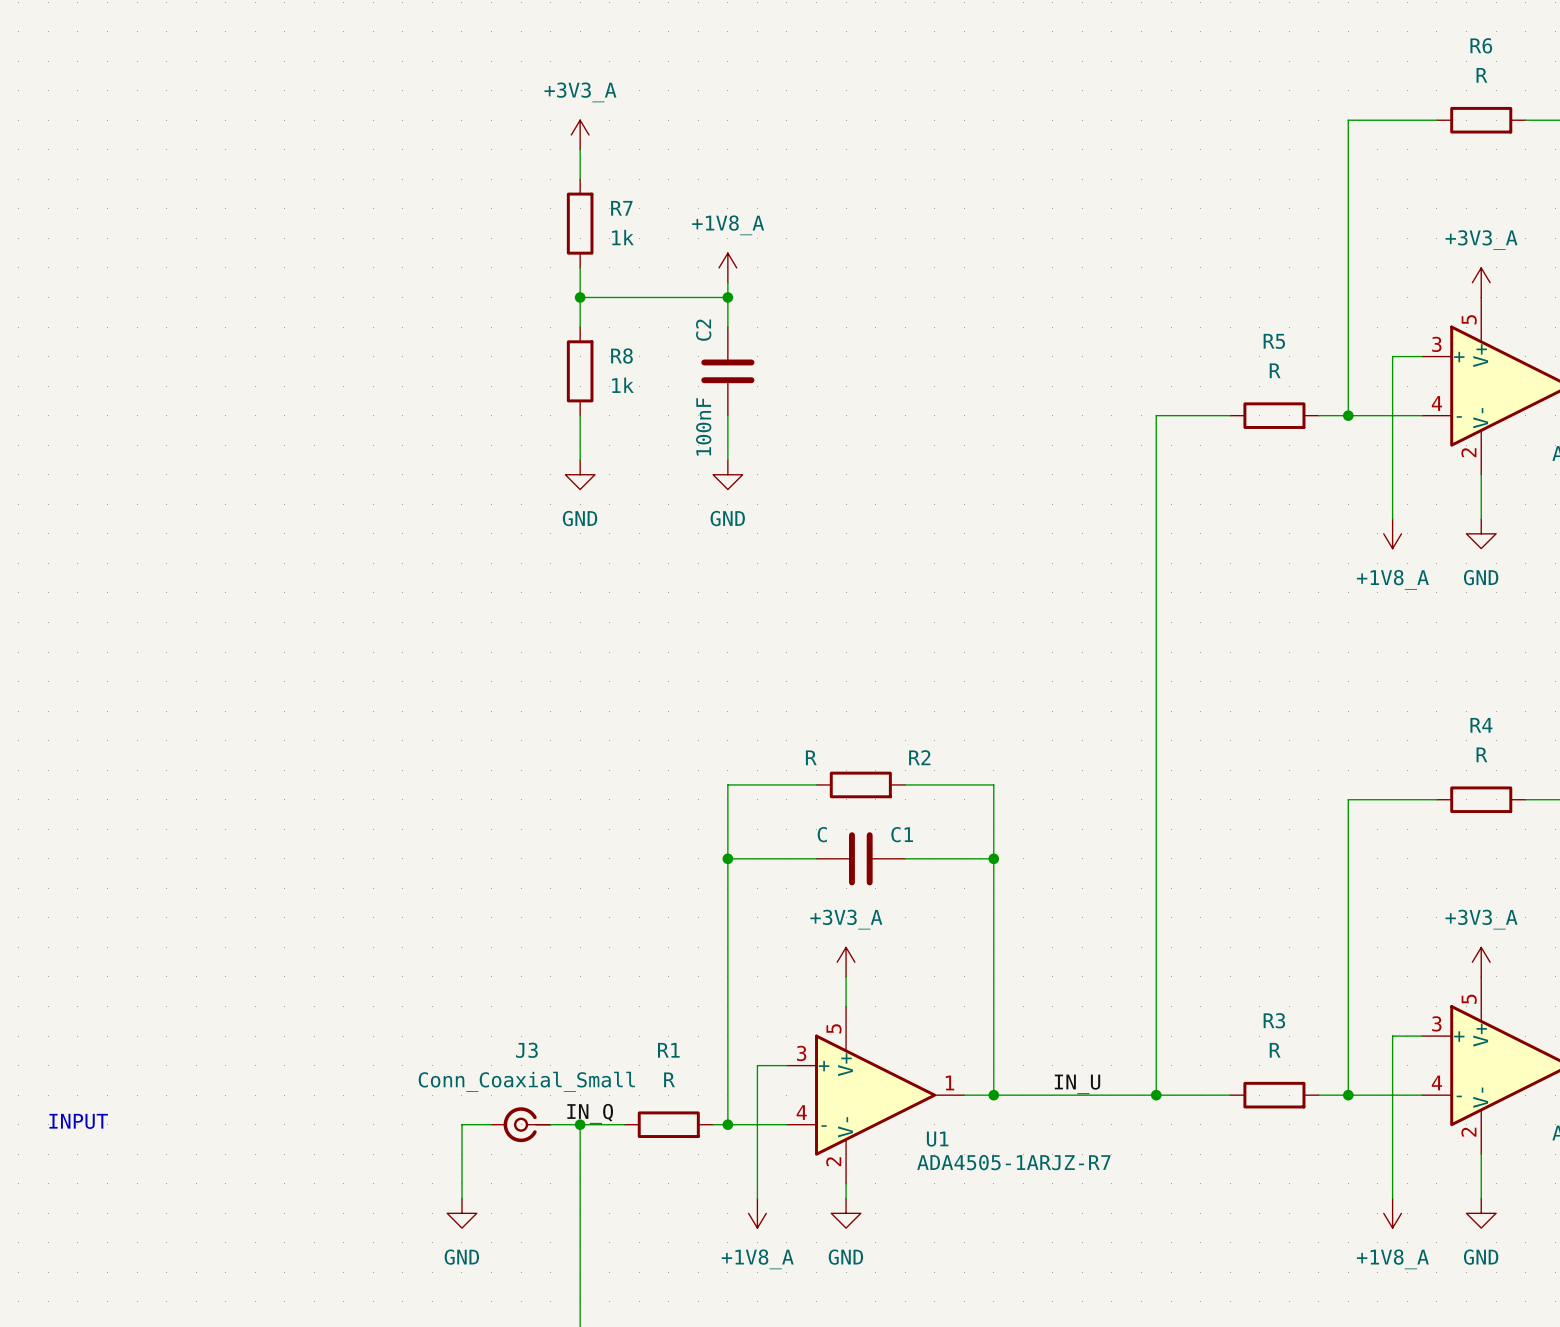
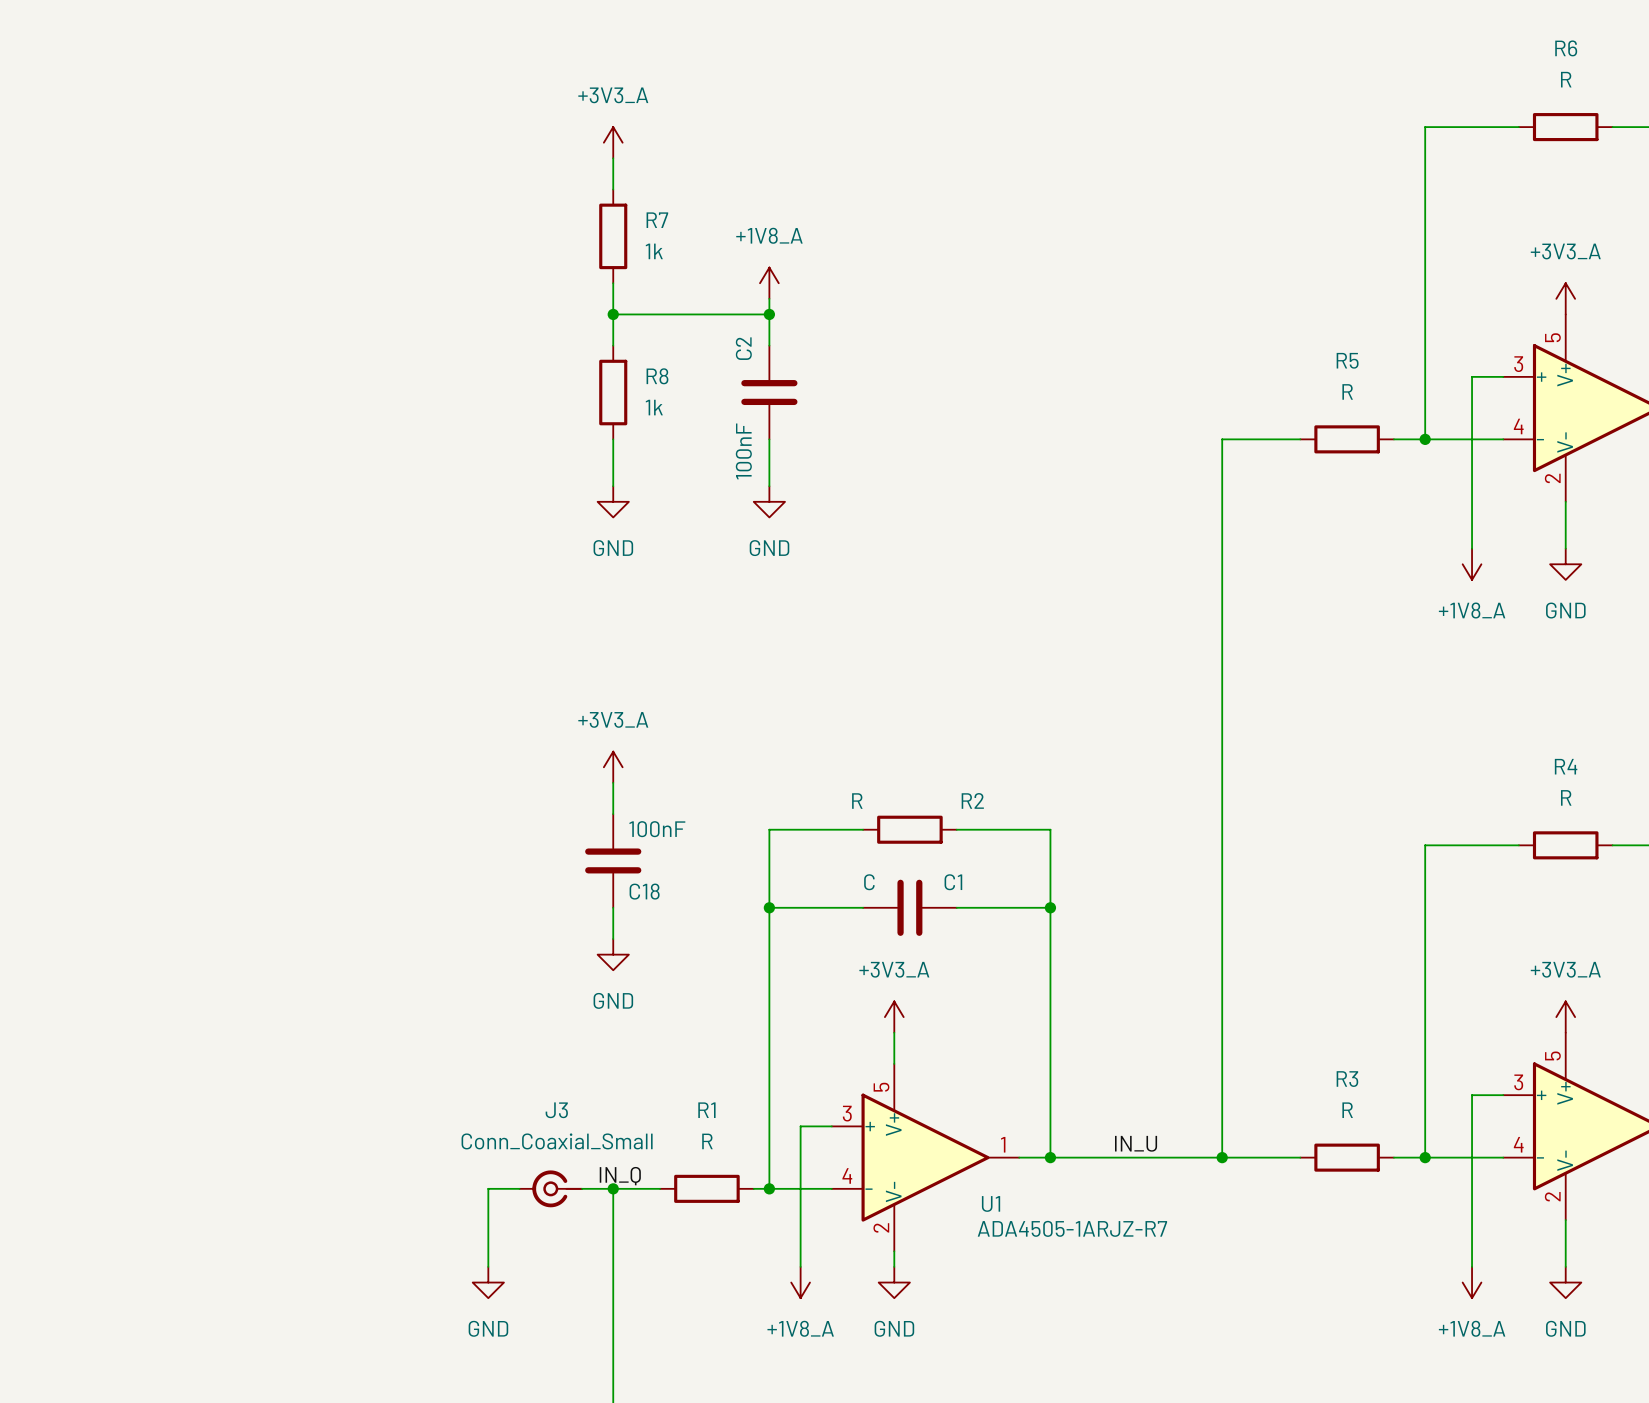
power symbol: none -> +3V3_A (613, 767)
wire: none -> (613, 782) (613, 814)
C18: none -> 100nF (613, 860)
wire: none -> (613, 907) (613, 939)
power symbol: none -> GND (613, 954)
text: INPUT (78, 1121) -> none

